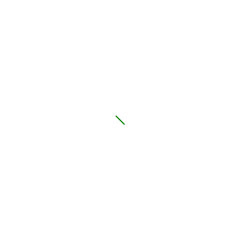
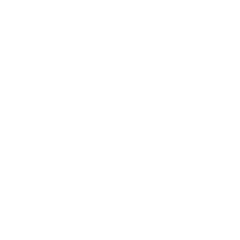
wire: (116, 116) (124, 124) -> none

